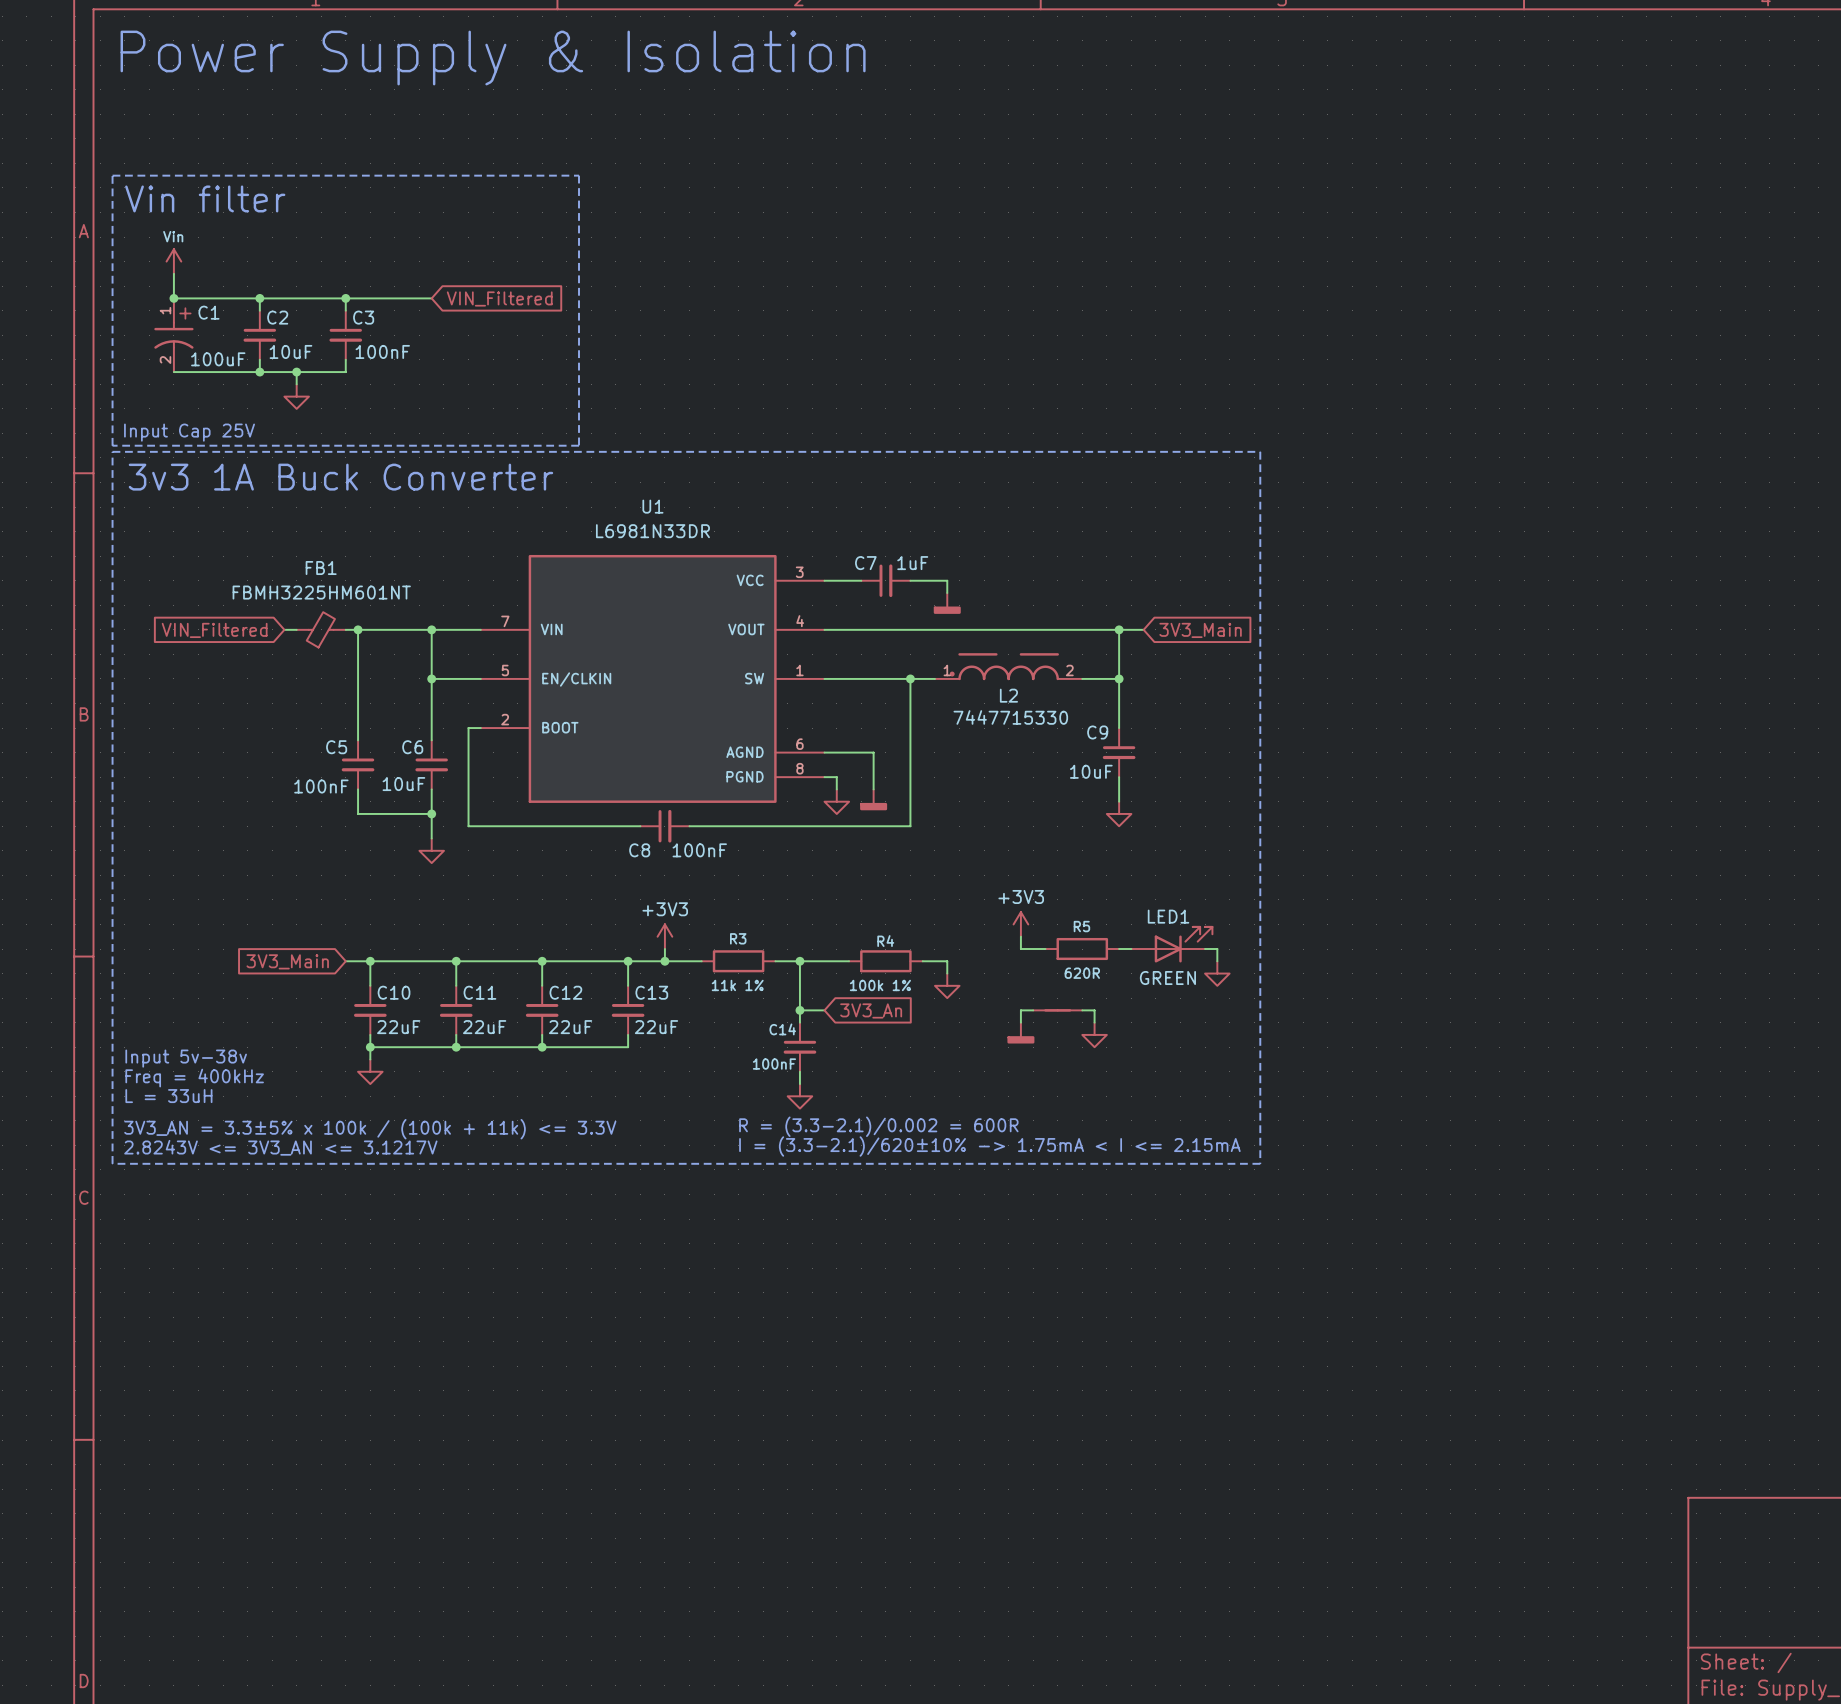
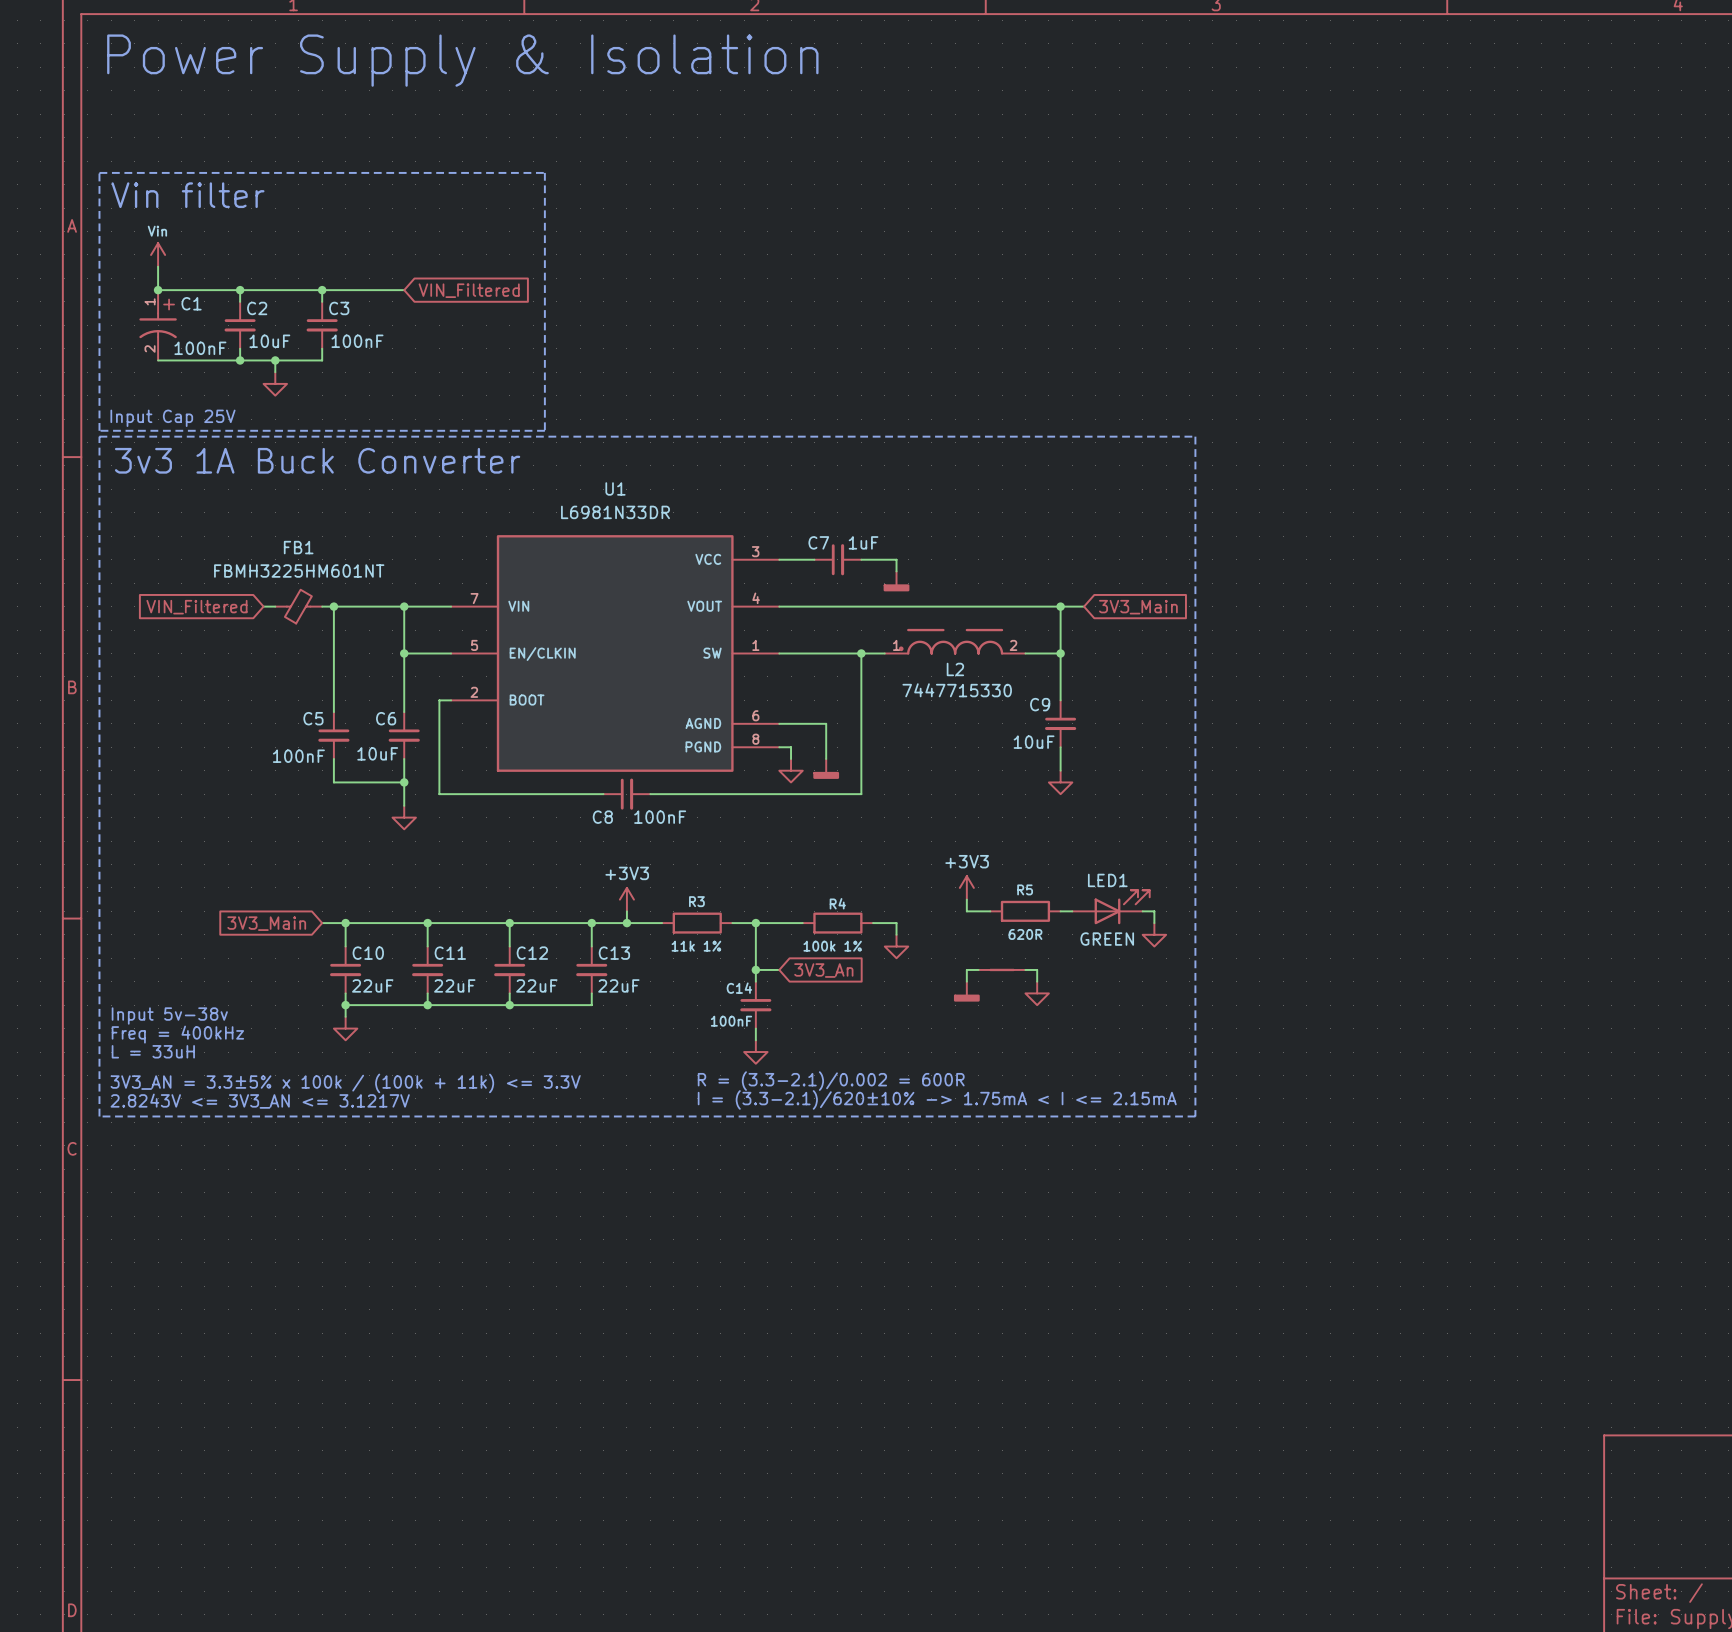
C1 value: 100uF (218, 359) -> 100nF (200, 348)

